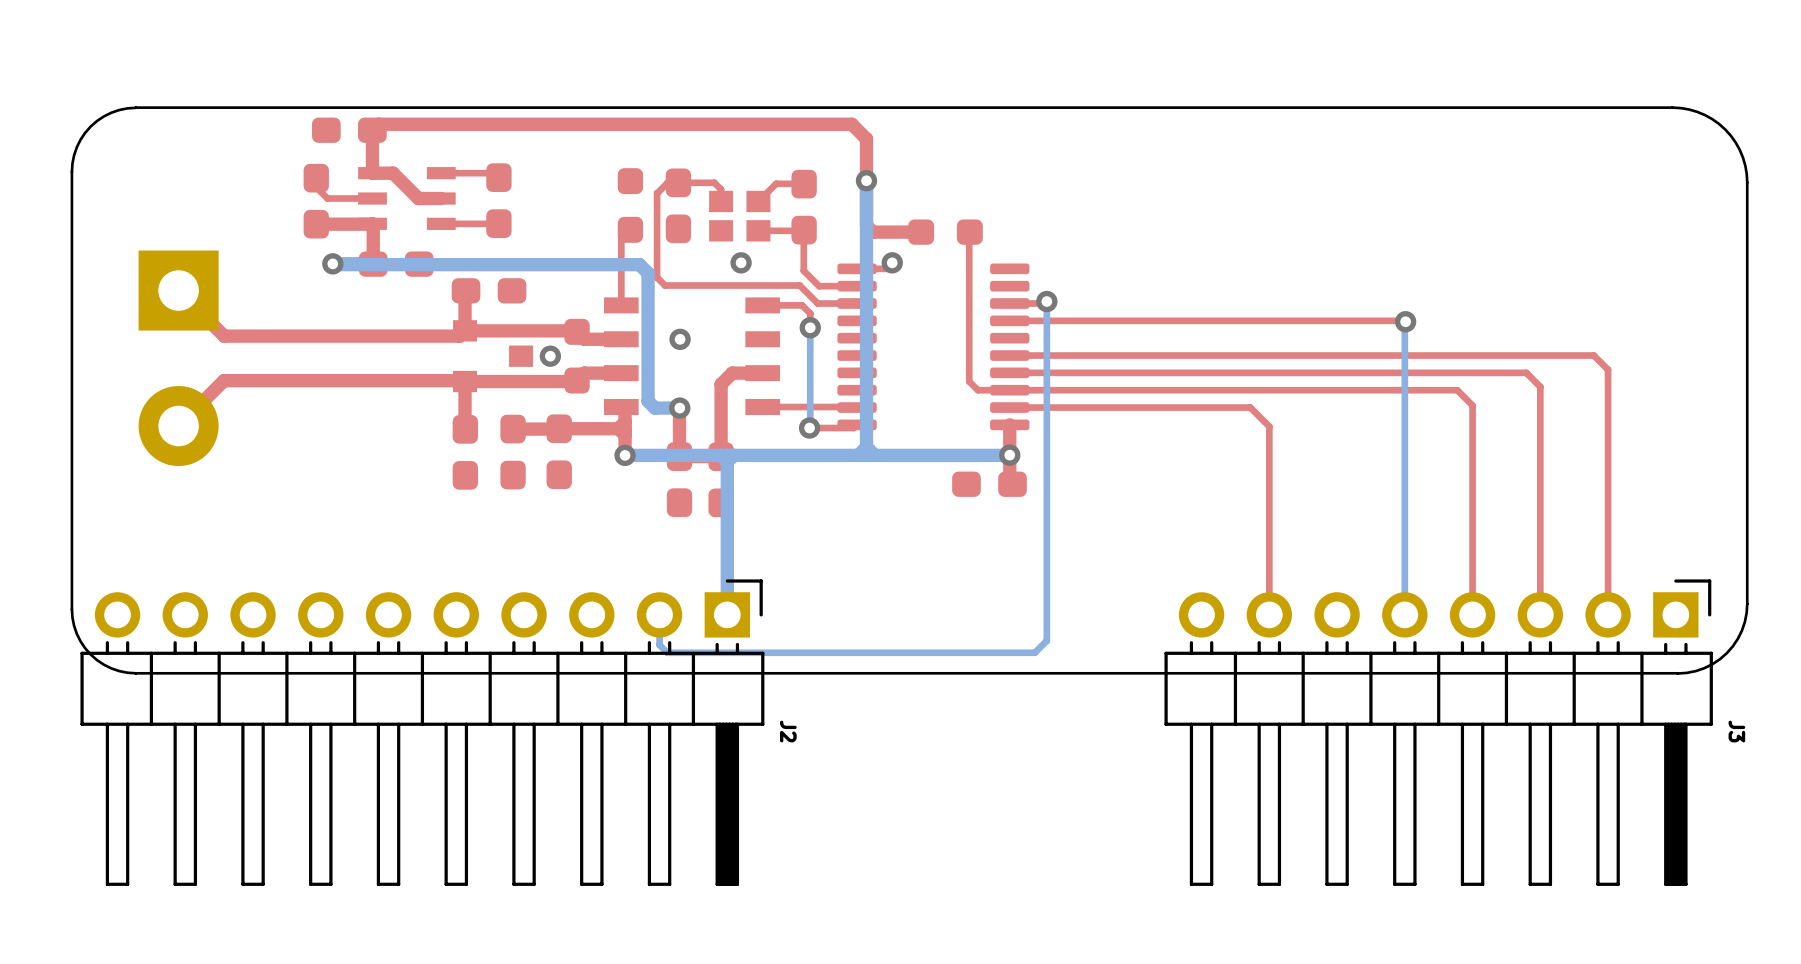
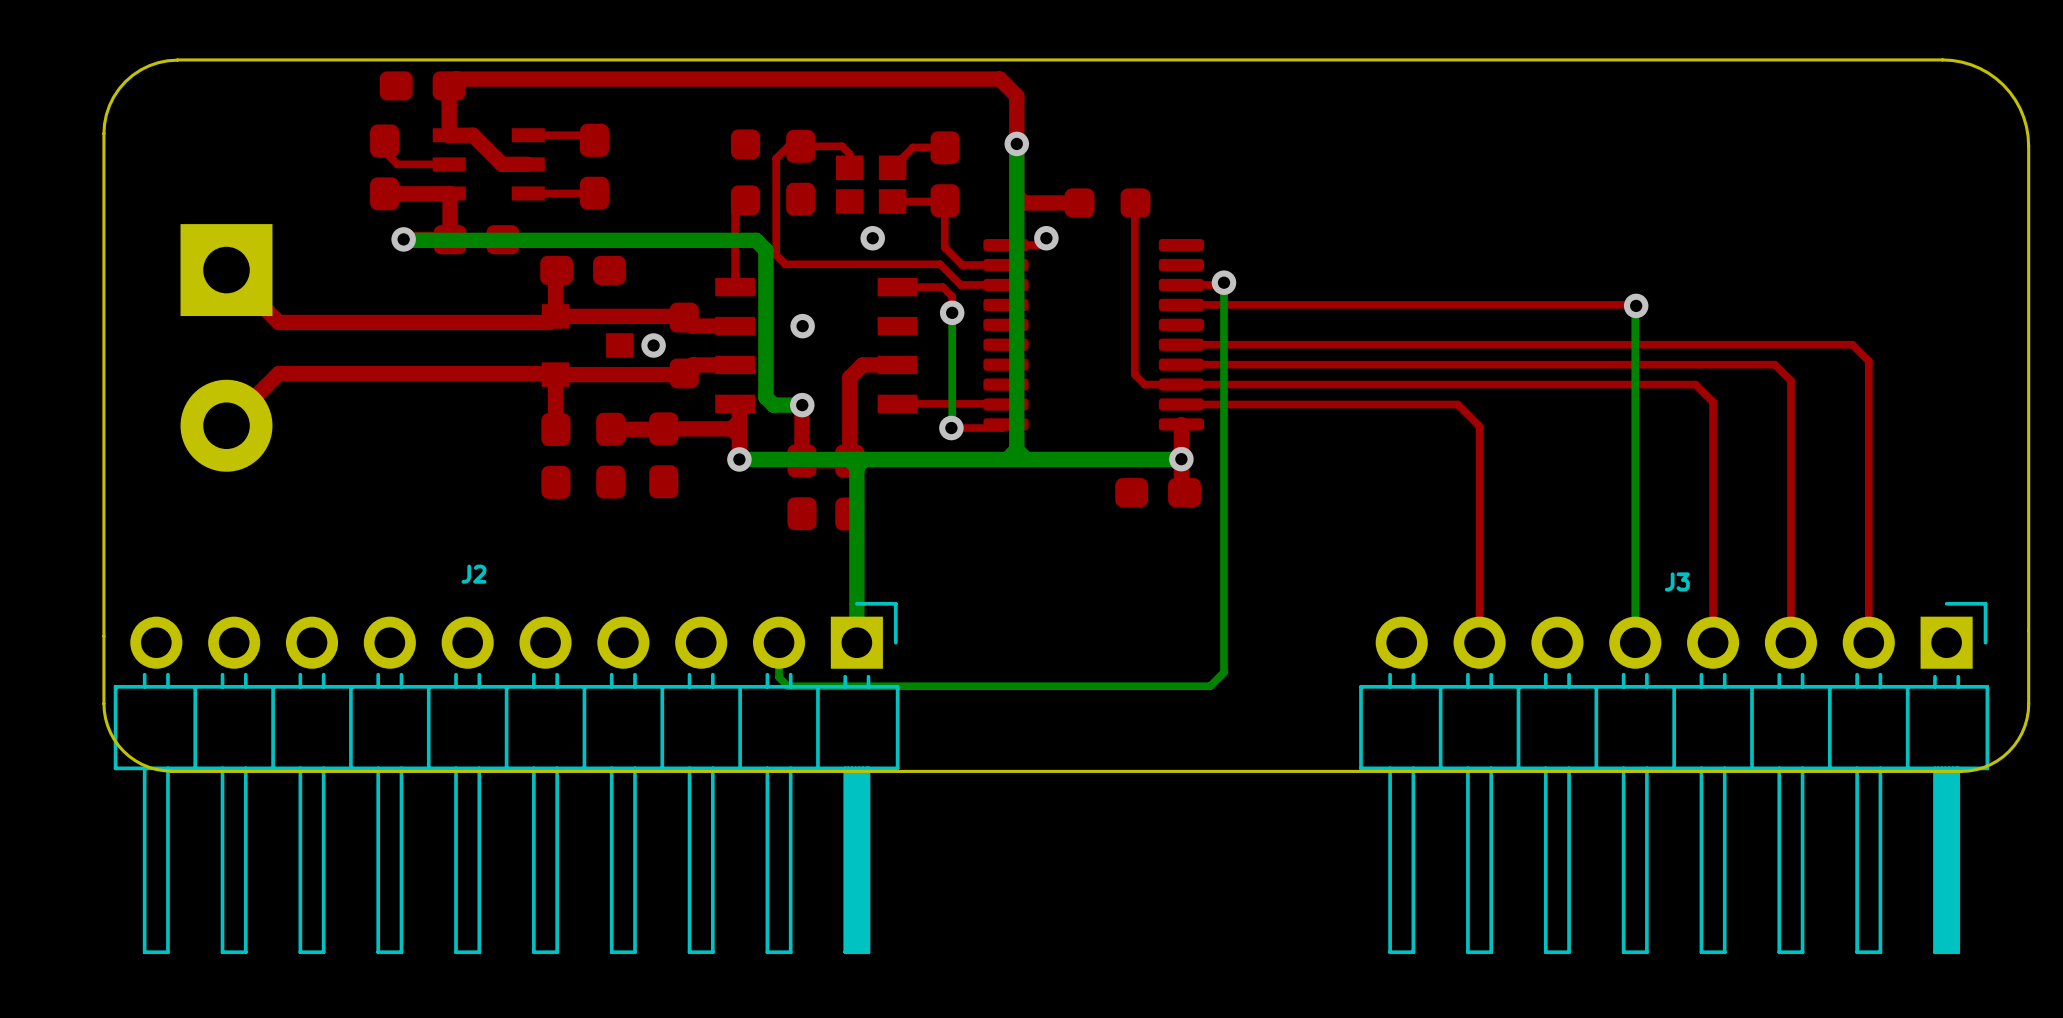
board edge: (1747, 603) (1741, 630) (1726, 653) (1704, 668) (1677, 673) -> (2028, 630) (2028, 711) (2022, 733) (2013, 745) (1997, 761) (1983, 767) (1968, 770) (171, 771)
board edge: (71, 609) (76, 633) (90, 654) (111, 668) (135, 673) (1677, 673) -> (103, 636) (104, 711) (110, 732) (118, 745) (135, 760) (156, 769) (171, 771)
J2 name rotation: 0° (788, 731) -> 90° counterclockwise (473, 574)
J2 name position: J2 (788, 731) -> J2 (473, 574)
J3 name rotation: 0° (1736, 731) -> 90° counterclockwise (1677, 581)
J3 name position: J3 (1736, 731) -> J3 (1677, 581)

